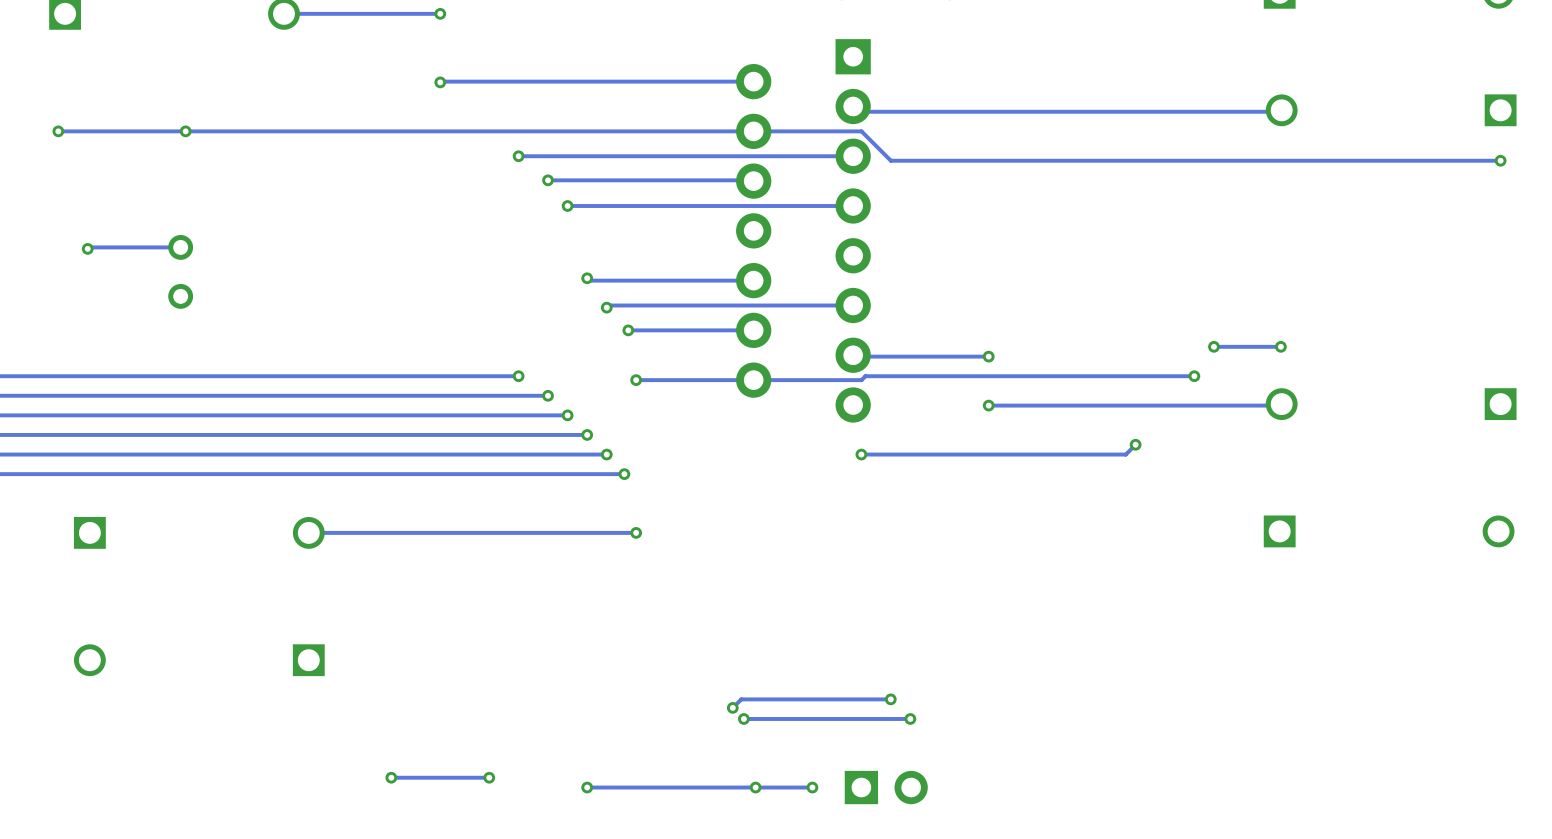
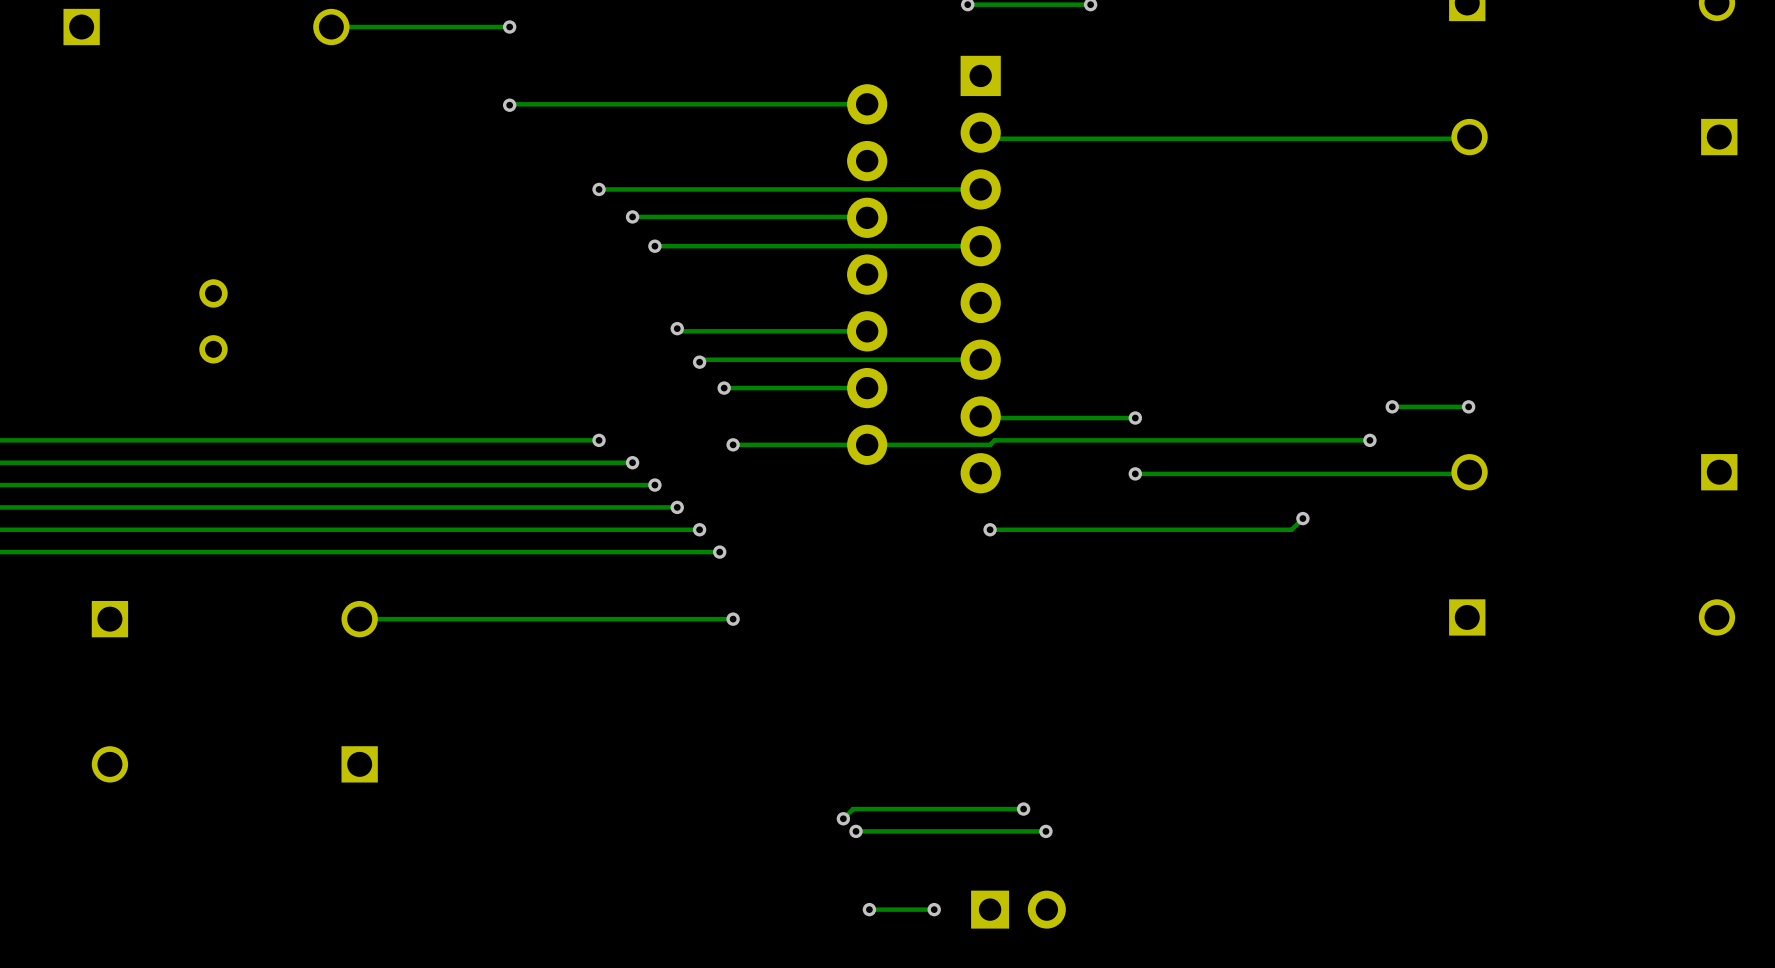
track: (58, 131) (861, 131) (890, 160) (1500, 160) -> none
via: (58, 131) -> none
via: (185, 131) -> none
via: (1500, 160) -> none
track: (180, 247) (87, 248) -> none
via: (87, 248) -> none
via: (391, 777) -> none
track: (489, 777) (391, 777) -> none
via: (489, 777) -> none
via: (587, 787) -> none
track: (755, 787) (587, 787) -> none

